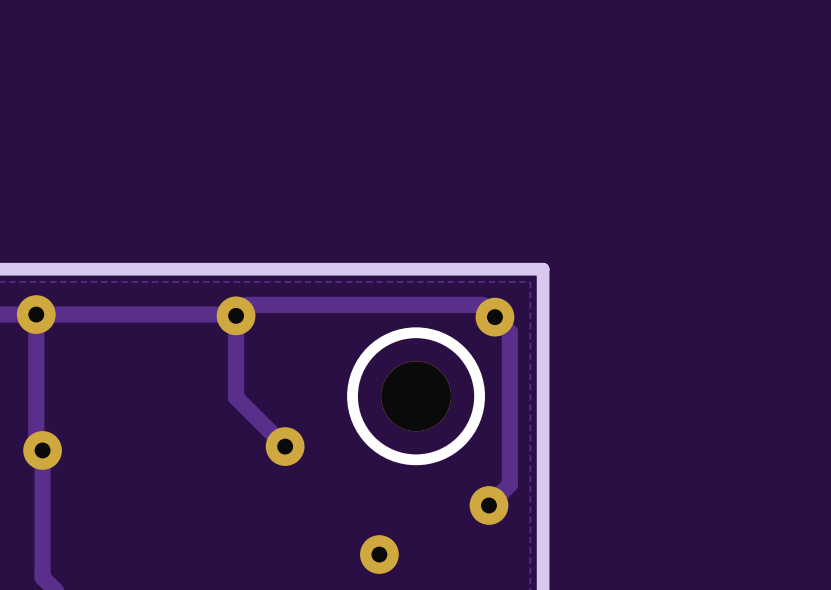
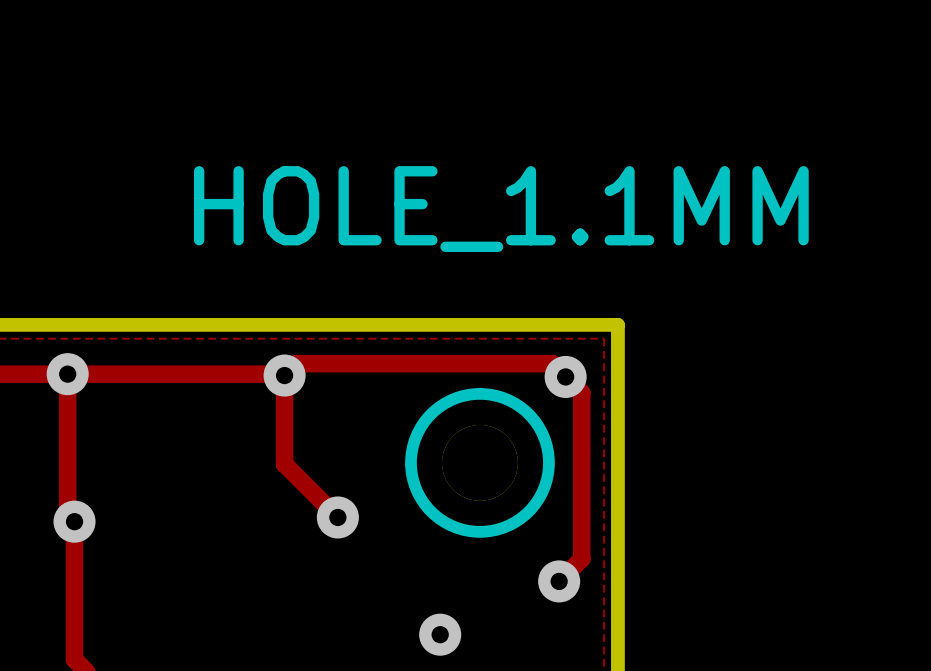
HOLE_1.1MM name: none -> HOLE_1.1MM (501, 209)

